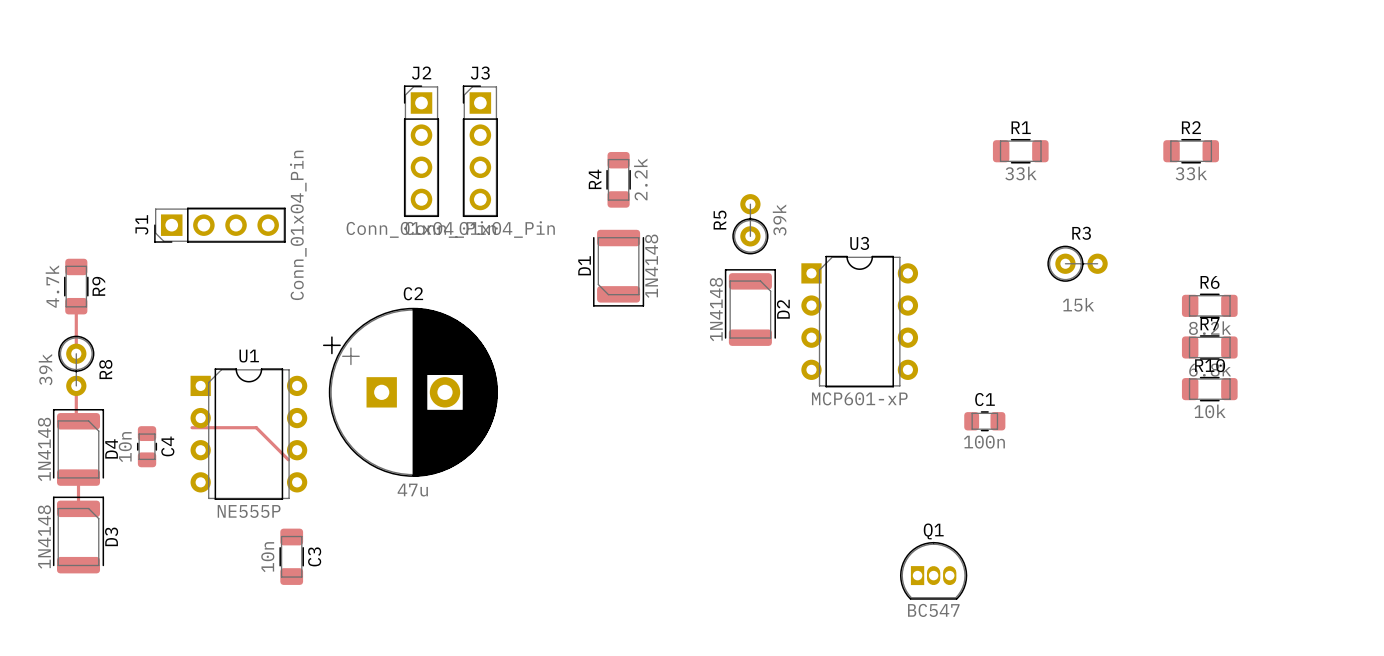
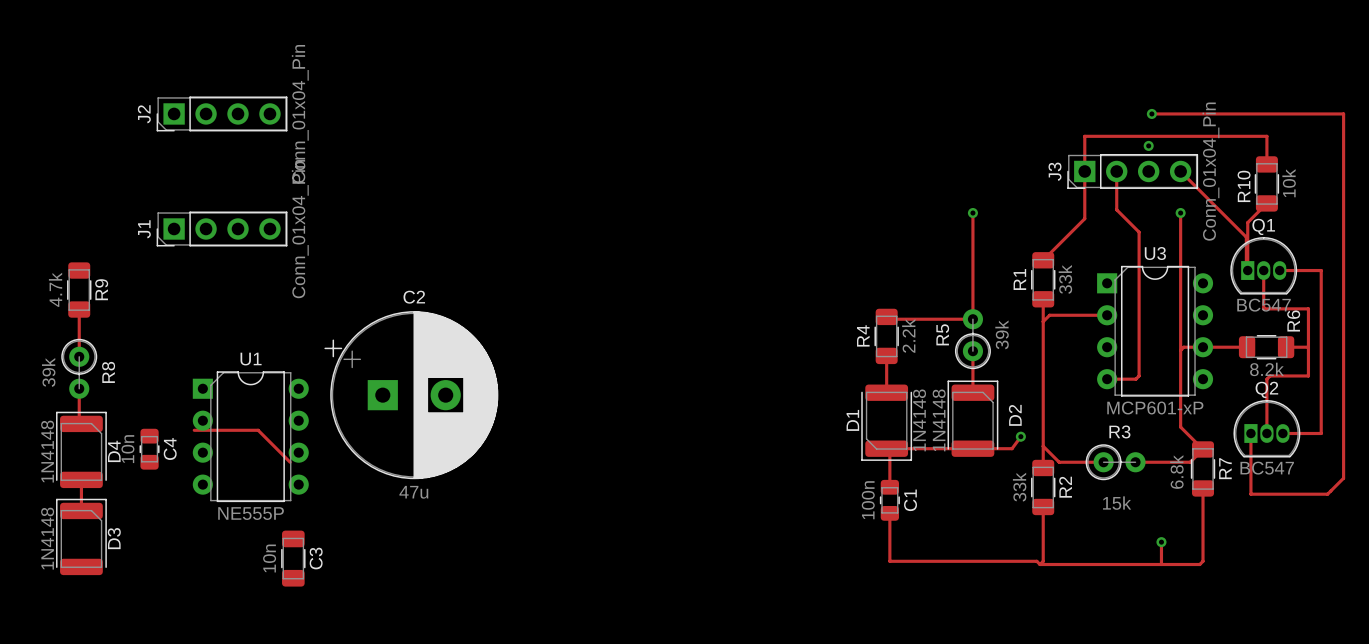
track: none -> (1151, 113) (1343, 113) (1343, 478) (1327, 494) (1250, 494) (1250, 433)
via: none -> (1151, 113)
R1 name position: R1 (1021, 127) -> R1 (1019, 279)
via: none -> (1148, 145)
J2 rotation: 0° (421, 151) -> 90° counterclockwise (222, 113)
J2 position: (421, 151) -> (222, 113)
J3 rotation: 0° (480, 151) -> 90° counterclockwise (1132, 171)
J3 position: (480, 151) -> (1132, 171)
R1 rotation: 0° (1020, 151) -> 90° clockwise (1043, 279)
R1 position: (1020, 151) -> (1043, 279)
R2 rotation: 0° (1191, 151) -> 90° clockwise (1043, 487)
R2 position: (1191, 151) -> (1043, 487)
track: none -> (1266, 164) (1266, 136) (1084, 136) (1084, 218) (1043, 260)
track: none -> (1116, 171) (1116, 209) (1139, 232) (1139, 375) (1135, 379) (1107, 379)
track: none -> (1180, 171) (1246, 237) (1247, 270) (1247, 222) (1266, 203)
R1 value position: 33k (1020, 173) -> 33k (1065, 279)
R4 position: (618, 179) -> (886, 336)
track: none -> (972, 213) (972, 319) (888, 319) (886, 316)
via: none -> (972, 213)
track: none -> (1180, 213) (1180, 427) (1203, 449) (1190, 462) (1135, 462)
via: none -> (1180, 213)
R5 position: (750, 224) -> (972, 339)
R3 position: (1077, 263) -> (1115, 462)
track: none -> (1263, 270) (1263, 308) (1308, 308) (1308, 375) (1270, 375) (1266, 379) (1266, 433)
track: none -> (1279, 270) (1321, 270) (1321, 433) (1282, 433)
D1 position: (618, 268) -> (886, 422)
R6 name rotation: 0° (1210, 282) -> 90° counterclockwise (1293, 320)
track: none -> (1043, 299) (1043, 467)
R6 position: (1209, 305) -> (1266, 347)
D2 position: (750, 307) -> (972, 418)
D2 name position: D2 (783, 309) -> D2 (1015, 415)
track: none -> (1107, 315) (1049, 315) (1043, 321)
U3 position: (859, 321) -> (1155, 331)
track: none -> (1247, 347) (1183, 347) (1180, 350)
track: none -> (1286, 347) (1308, 347)
R7 rotation: 0° (1209, 347) -> 90° clockwise (1203, 468)
R7 position: (1209, 347) -> (1203, 468)
track: none -> (972, 351) (972, 392)
track: none -> (886, 355) (886, 392)
R10 name position: R10 (1210, 365) -> R10 (1244, 186)
R10 rotation: 0° (1209, 389) -> 90° clockwise (1266, 183)
R10 position: (1209, 389) -> (1266, 183)
R10 value position: 10k (1210, 411) -> 10k (1289, 183)
C1 rotation: 0° (984, 421) -> 90° clockwise (889, 500)
C1 position: (984, 421) -> (889, 500)
Q2: none -> BC547 (1266, 428)
via: none -> (1020, 436)
track: none -> (1020, 439) (1020, 436) (1012, 448) (886, 448) (889, 451) (889, 487)
track: none -> (1043, 446) (1059, 462) (1103, 462)
track: none -> (1203, 488) (1203, 561) (1199, 564) (1040, 564)
track: none -> (1043, 506) (1043, 561) (1040, 564)
track: none -> (889, 513) (889, 561) (1036, 561) (1040, 564)
track: none -> (1161, 542) (1161, 564)
via: none -> (1161, 542)
Q1 position: (933, 570) -> (1263, 265)

